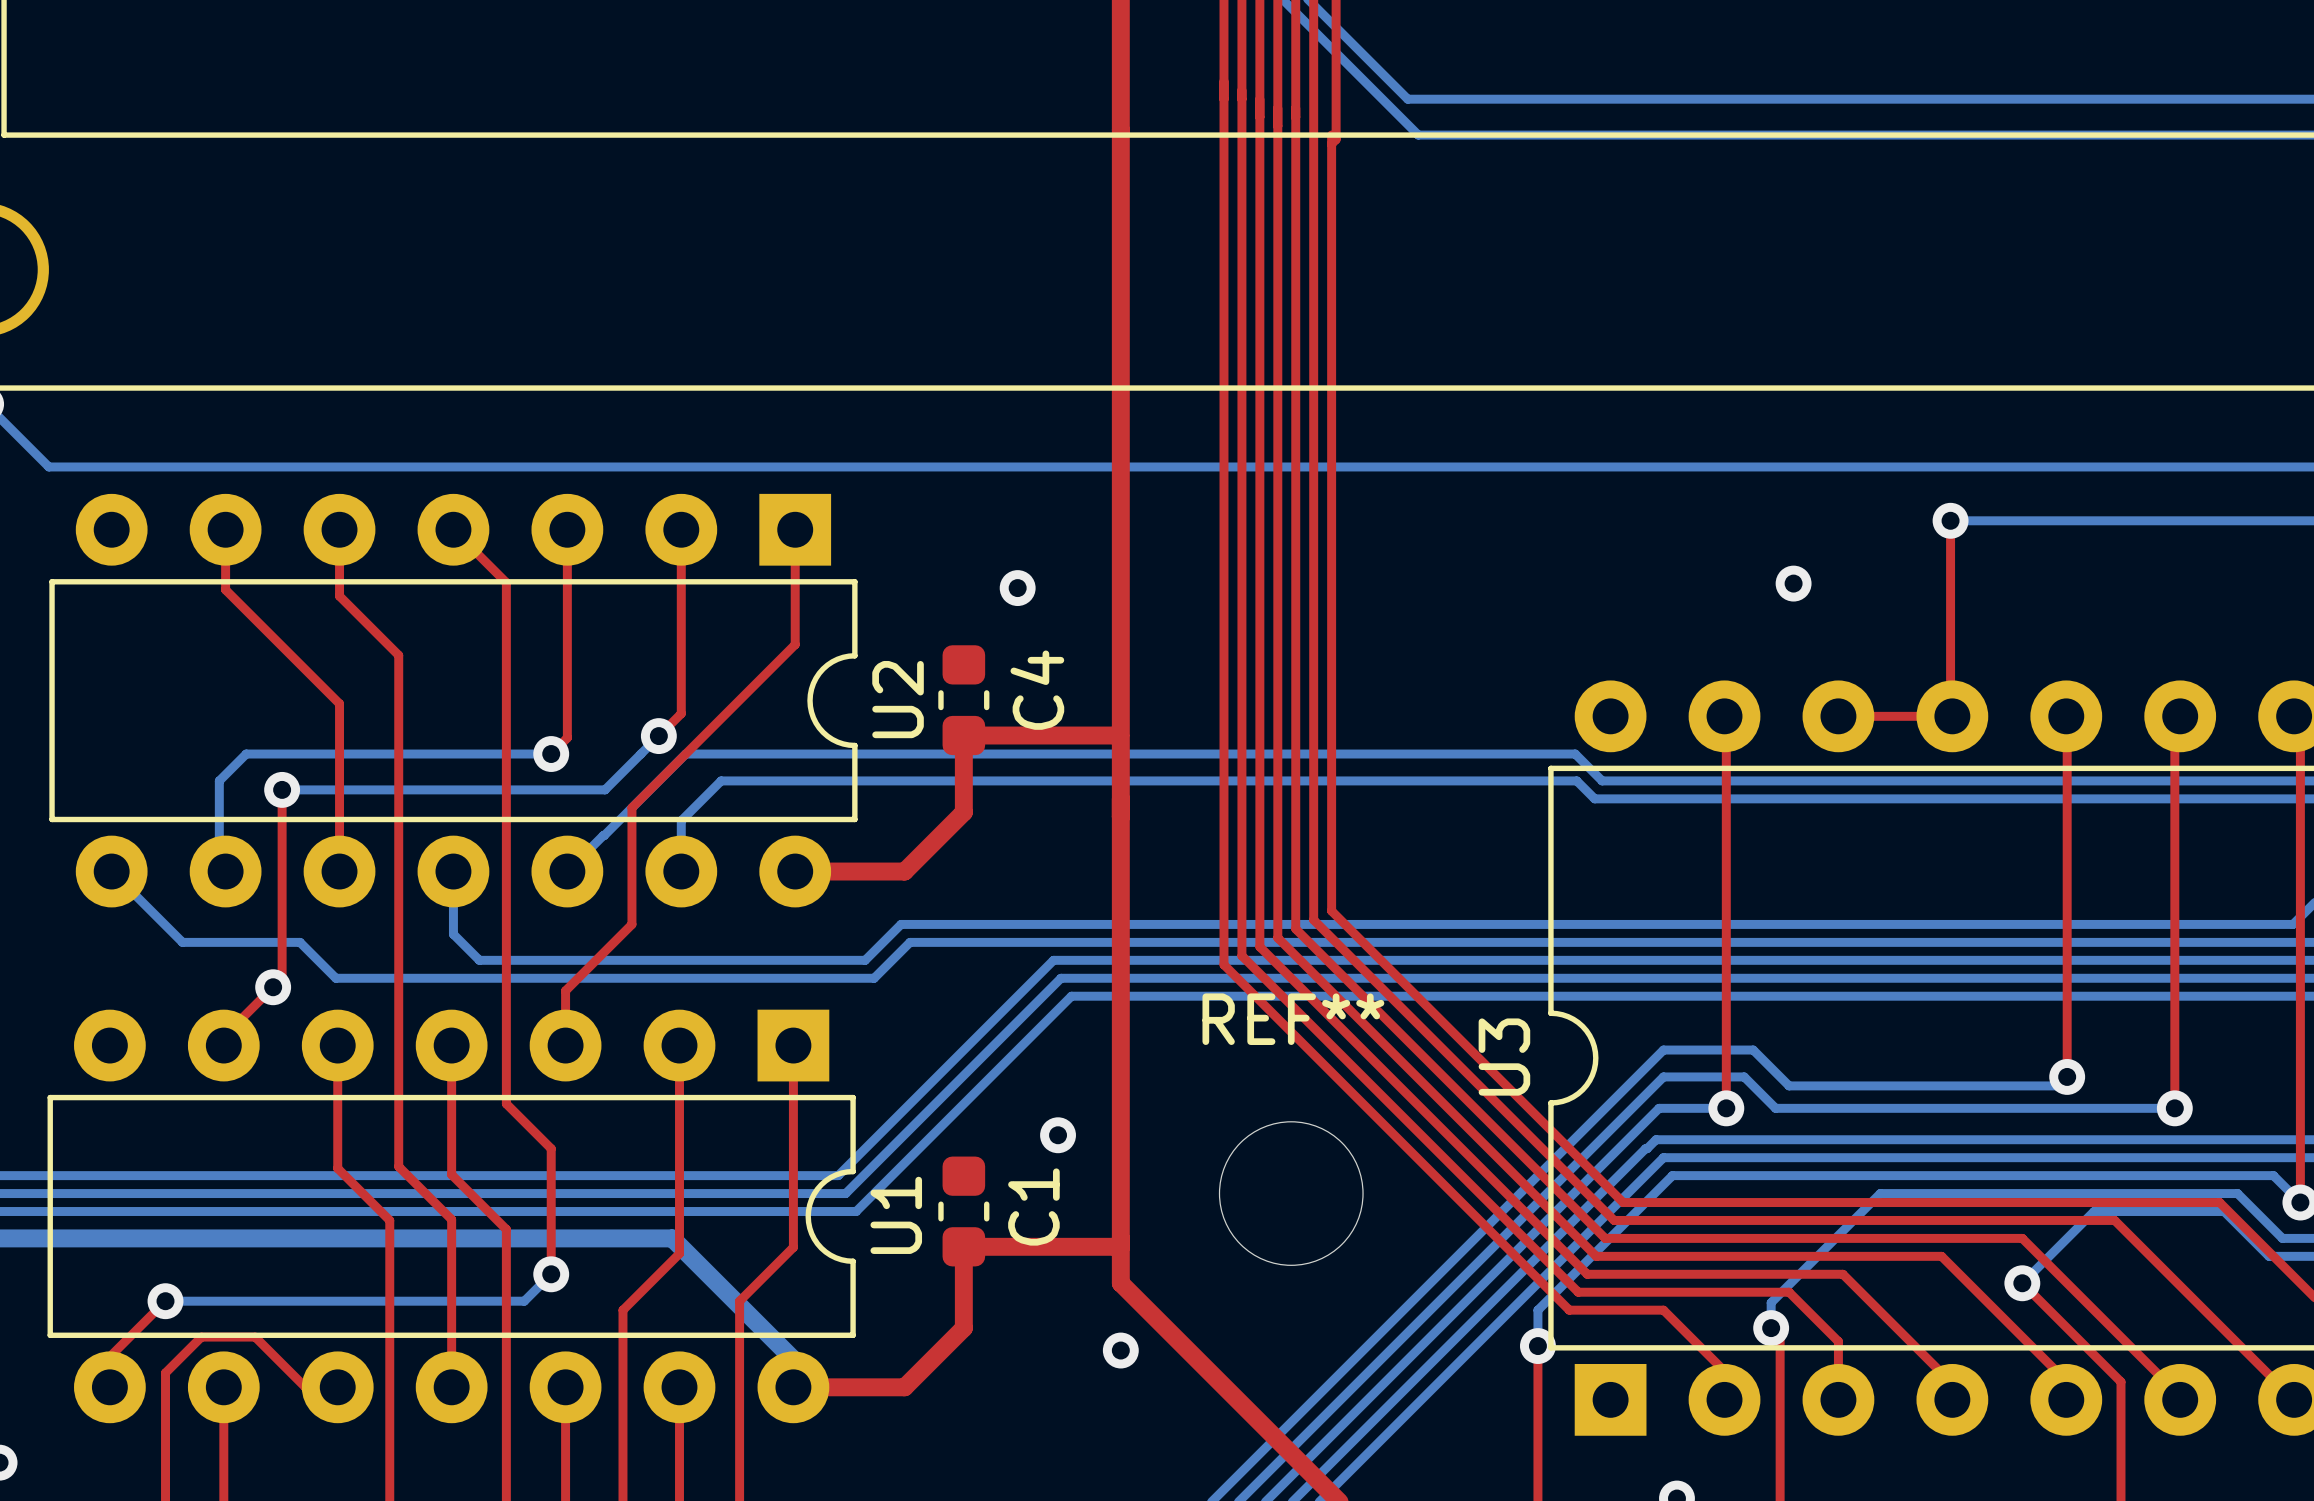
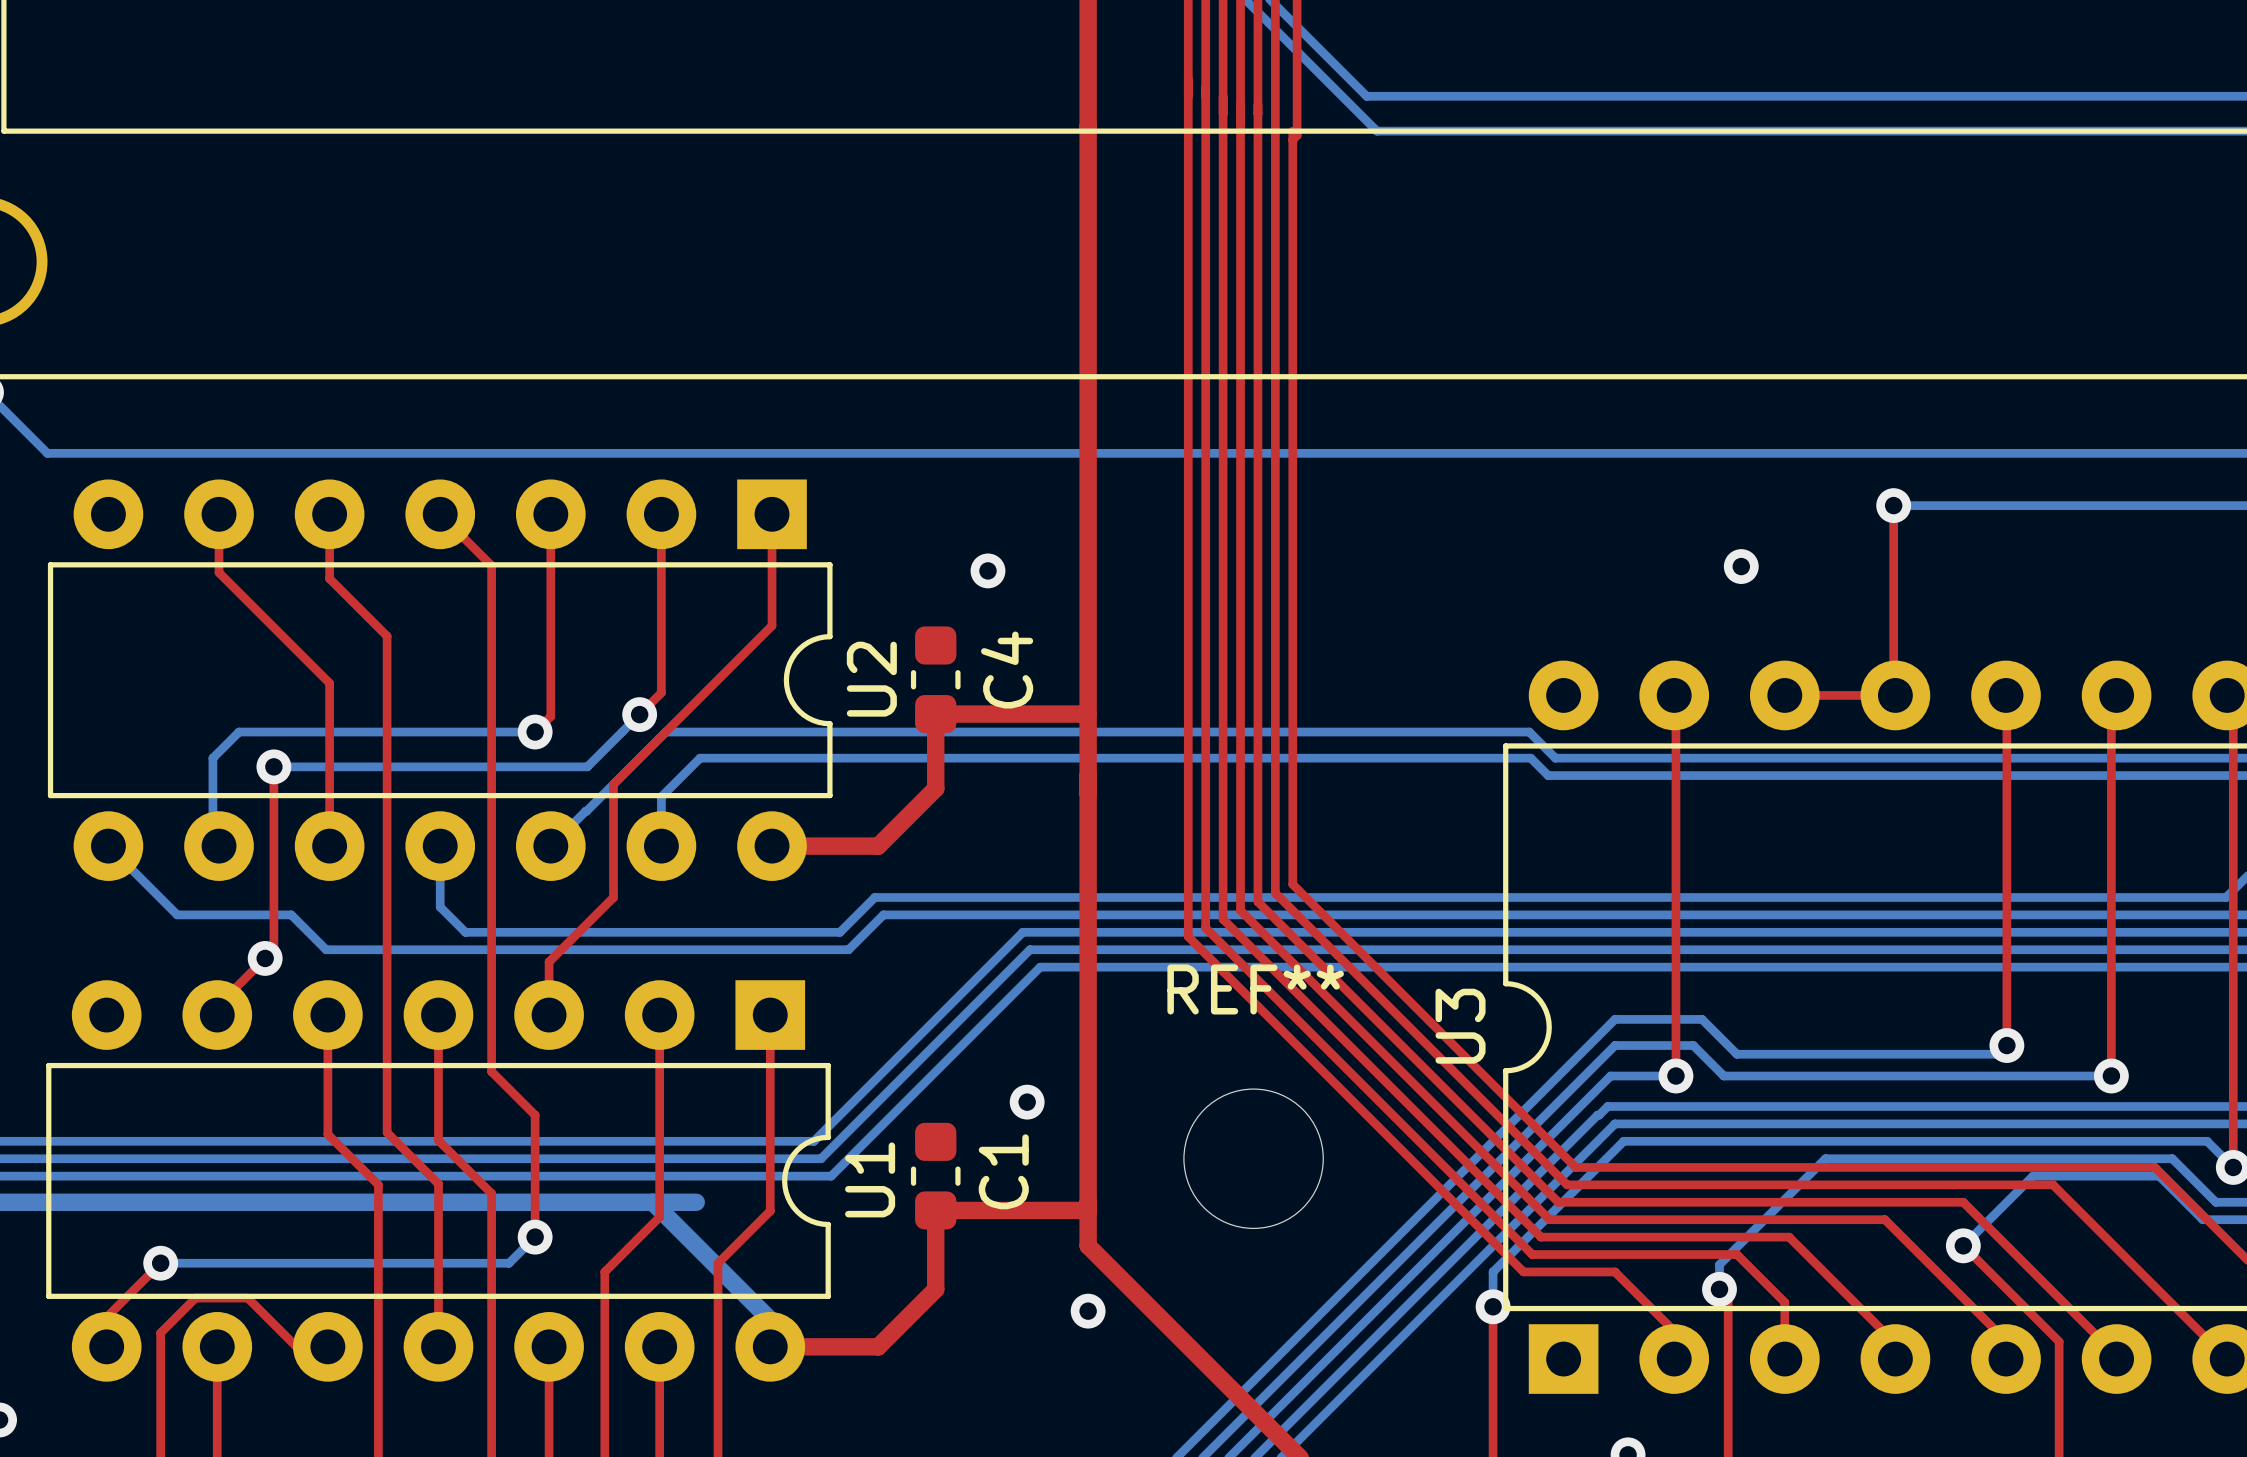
bottom track: none -> (652, 1202) (696, 1202)

